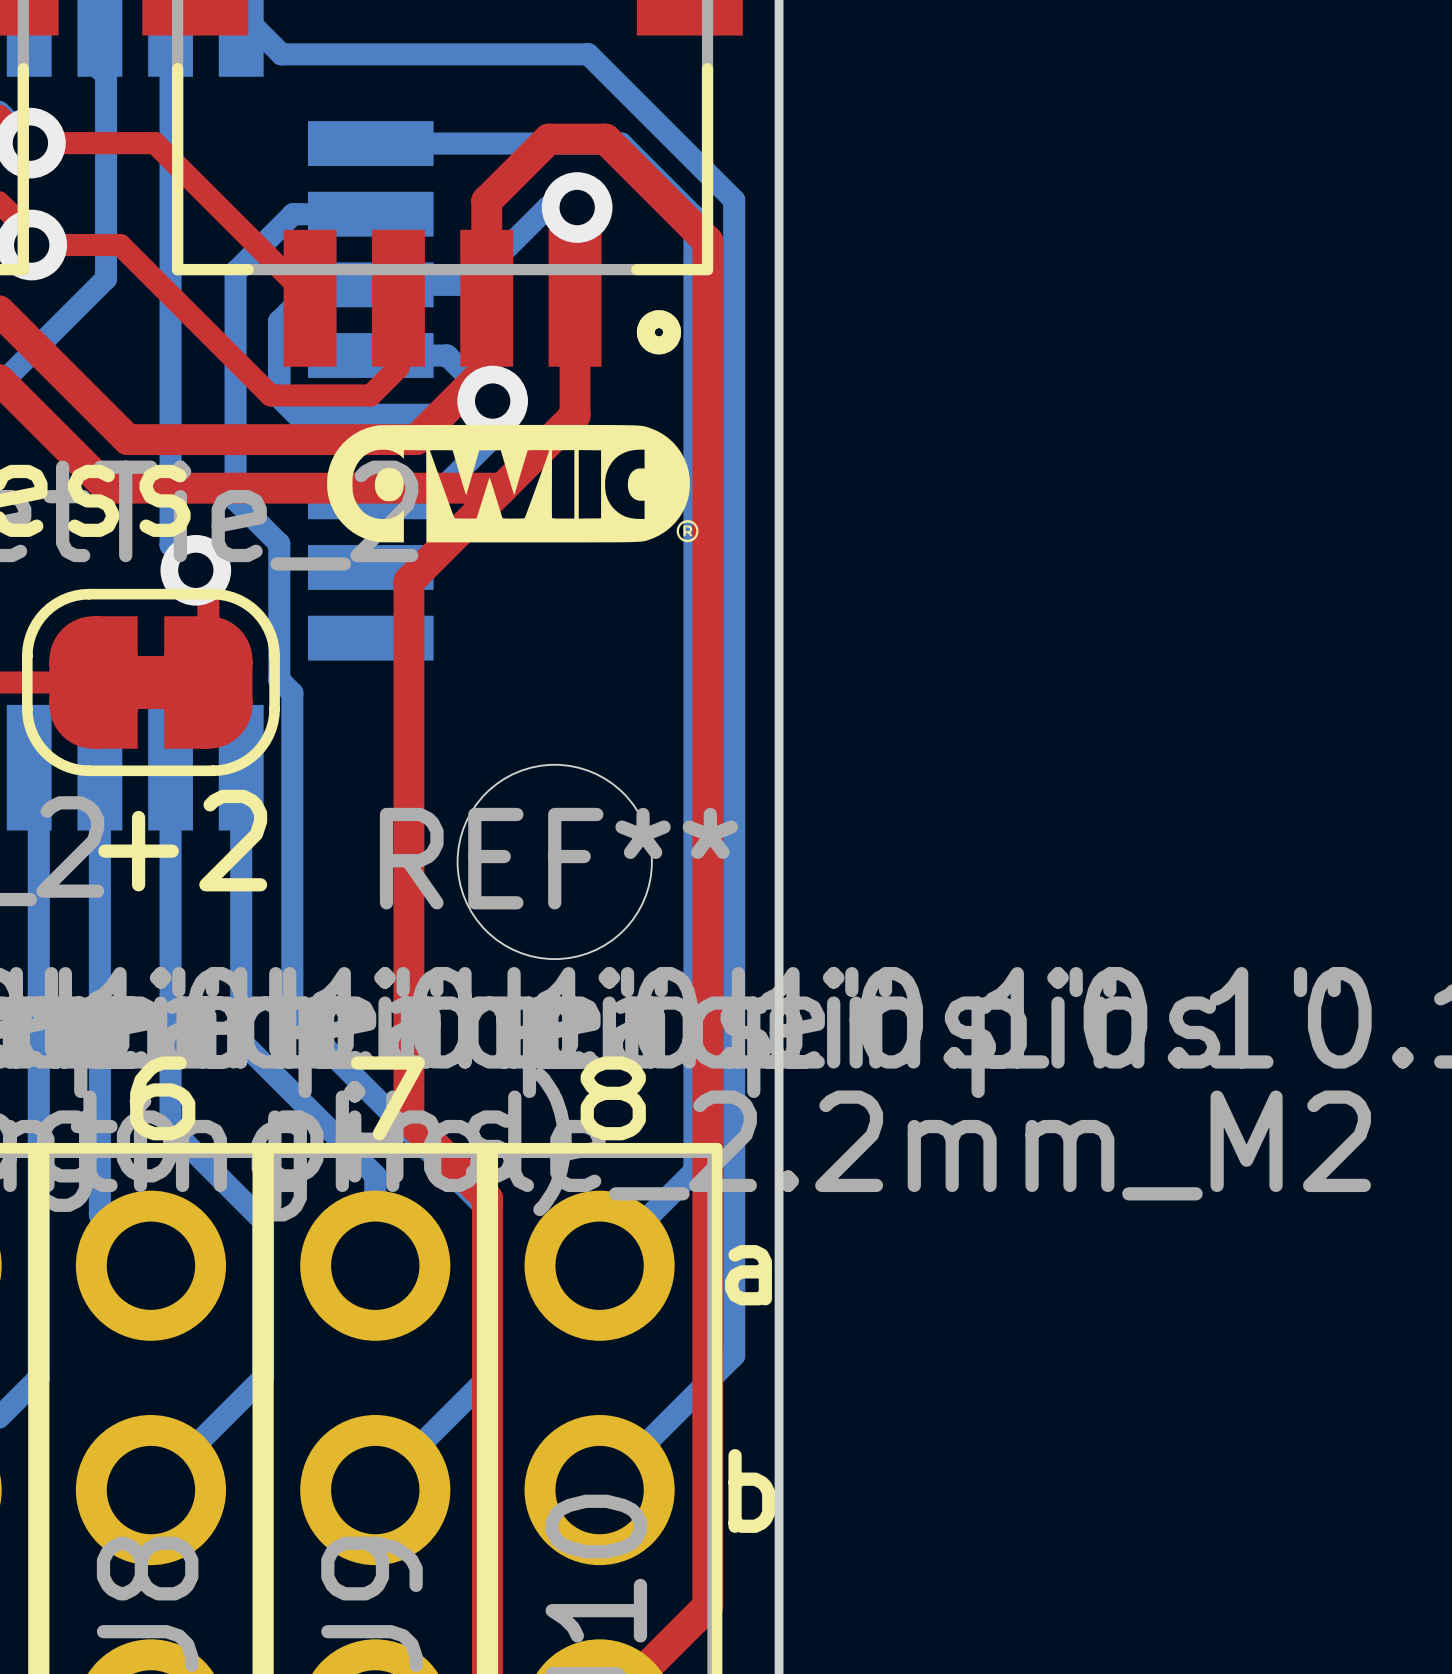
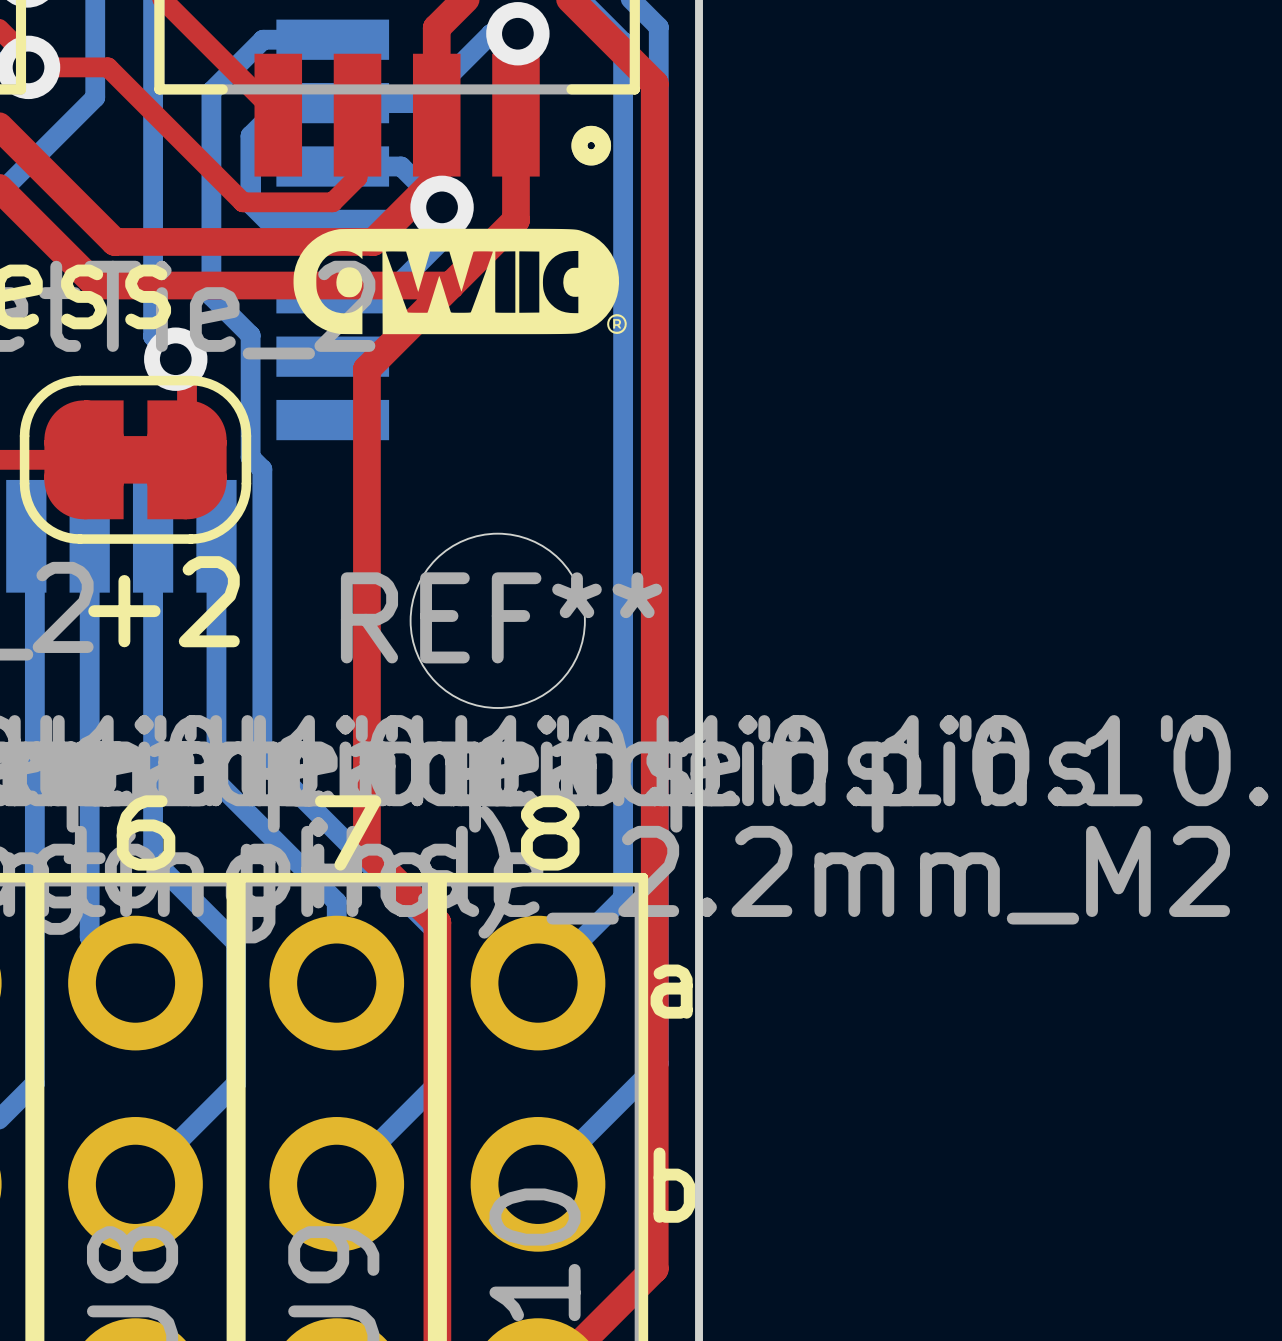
top track: (707, 241) (707, 1606) -> (635, 64) (654, 83) (654, 1268) (635, 1288)

